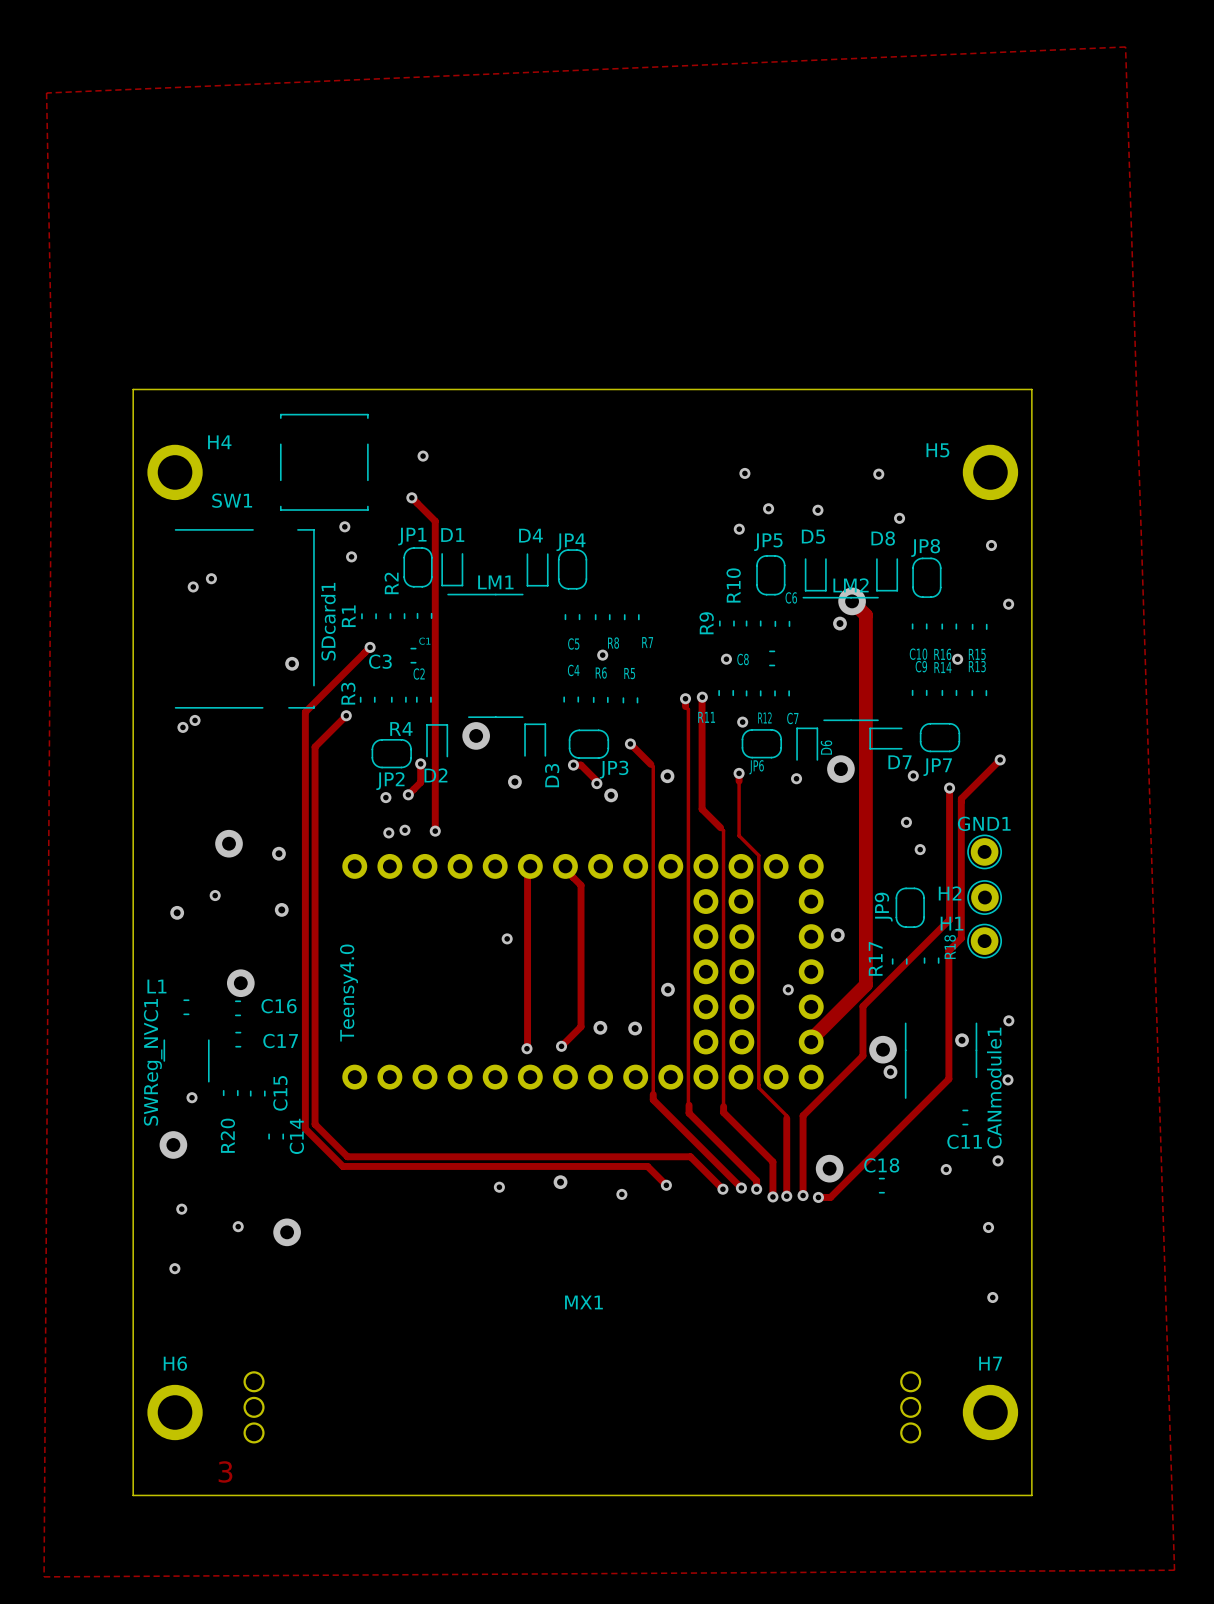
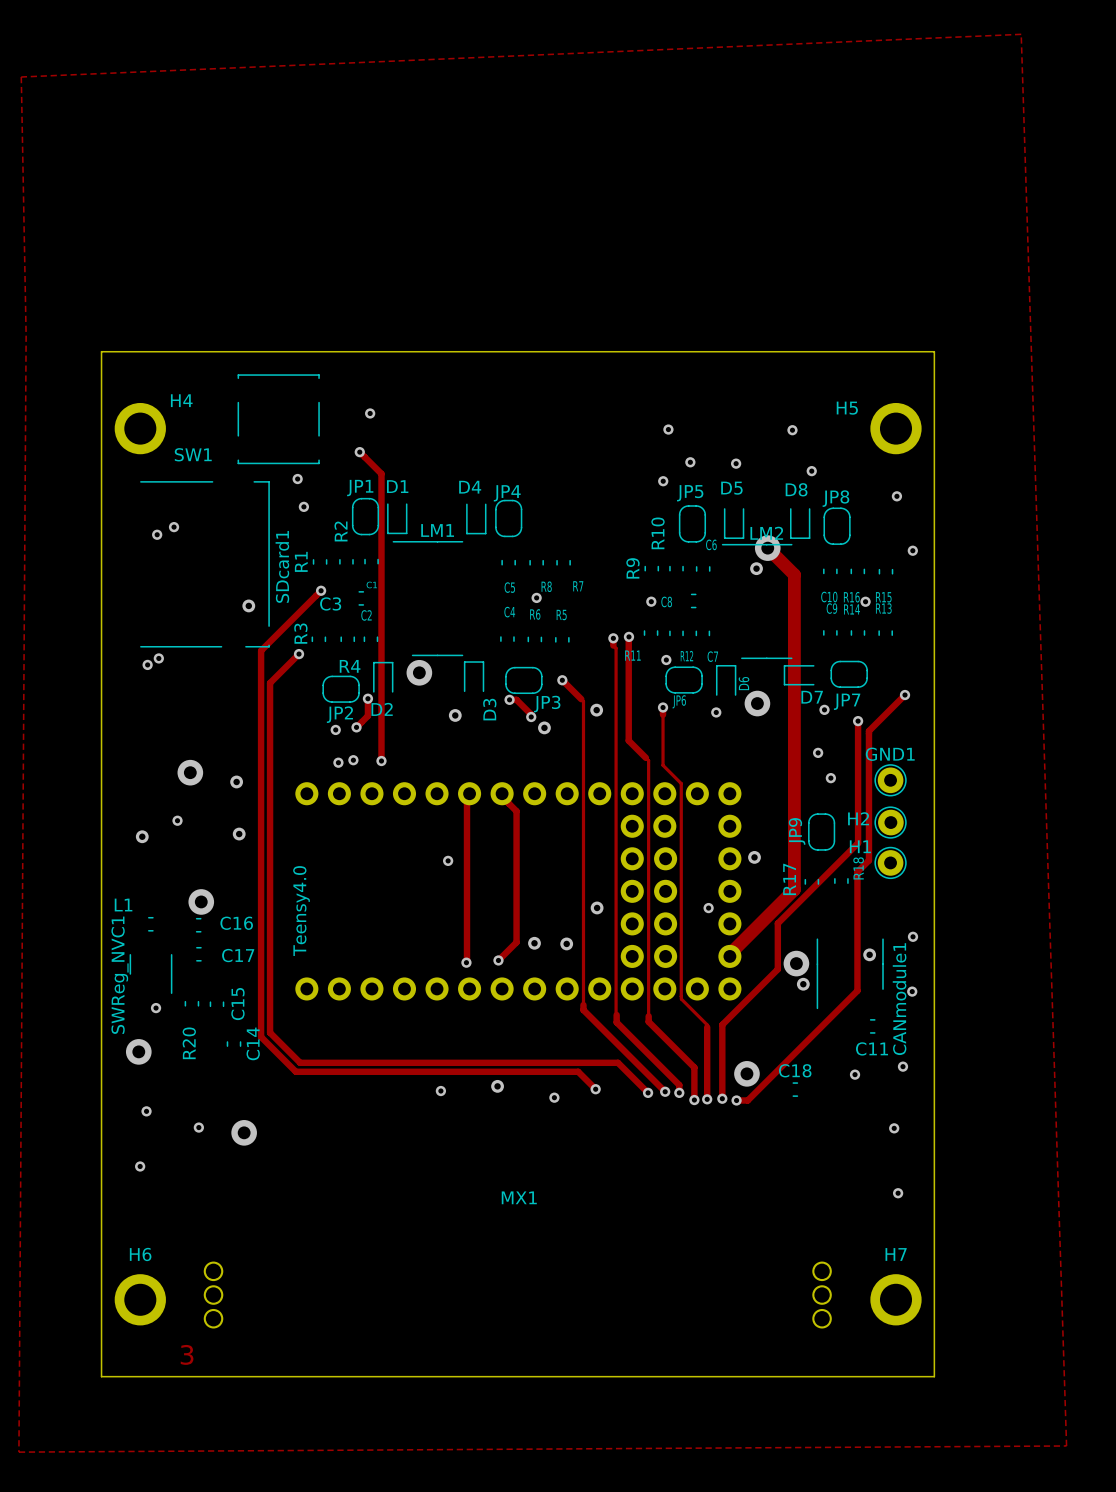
track: (865, 615) (865, 984) -> (780, 560) (794, 574) (794, 889) (780, 903)

